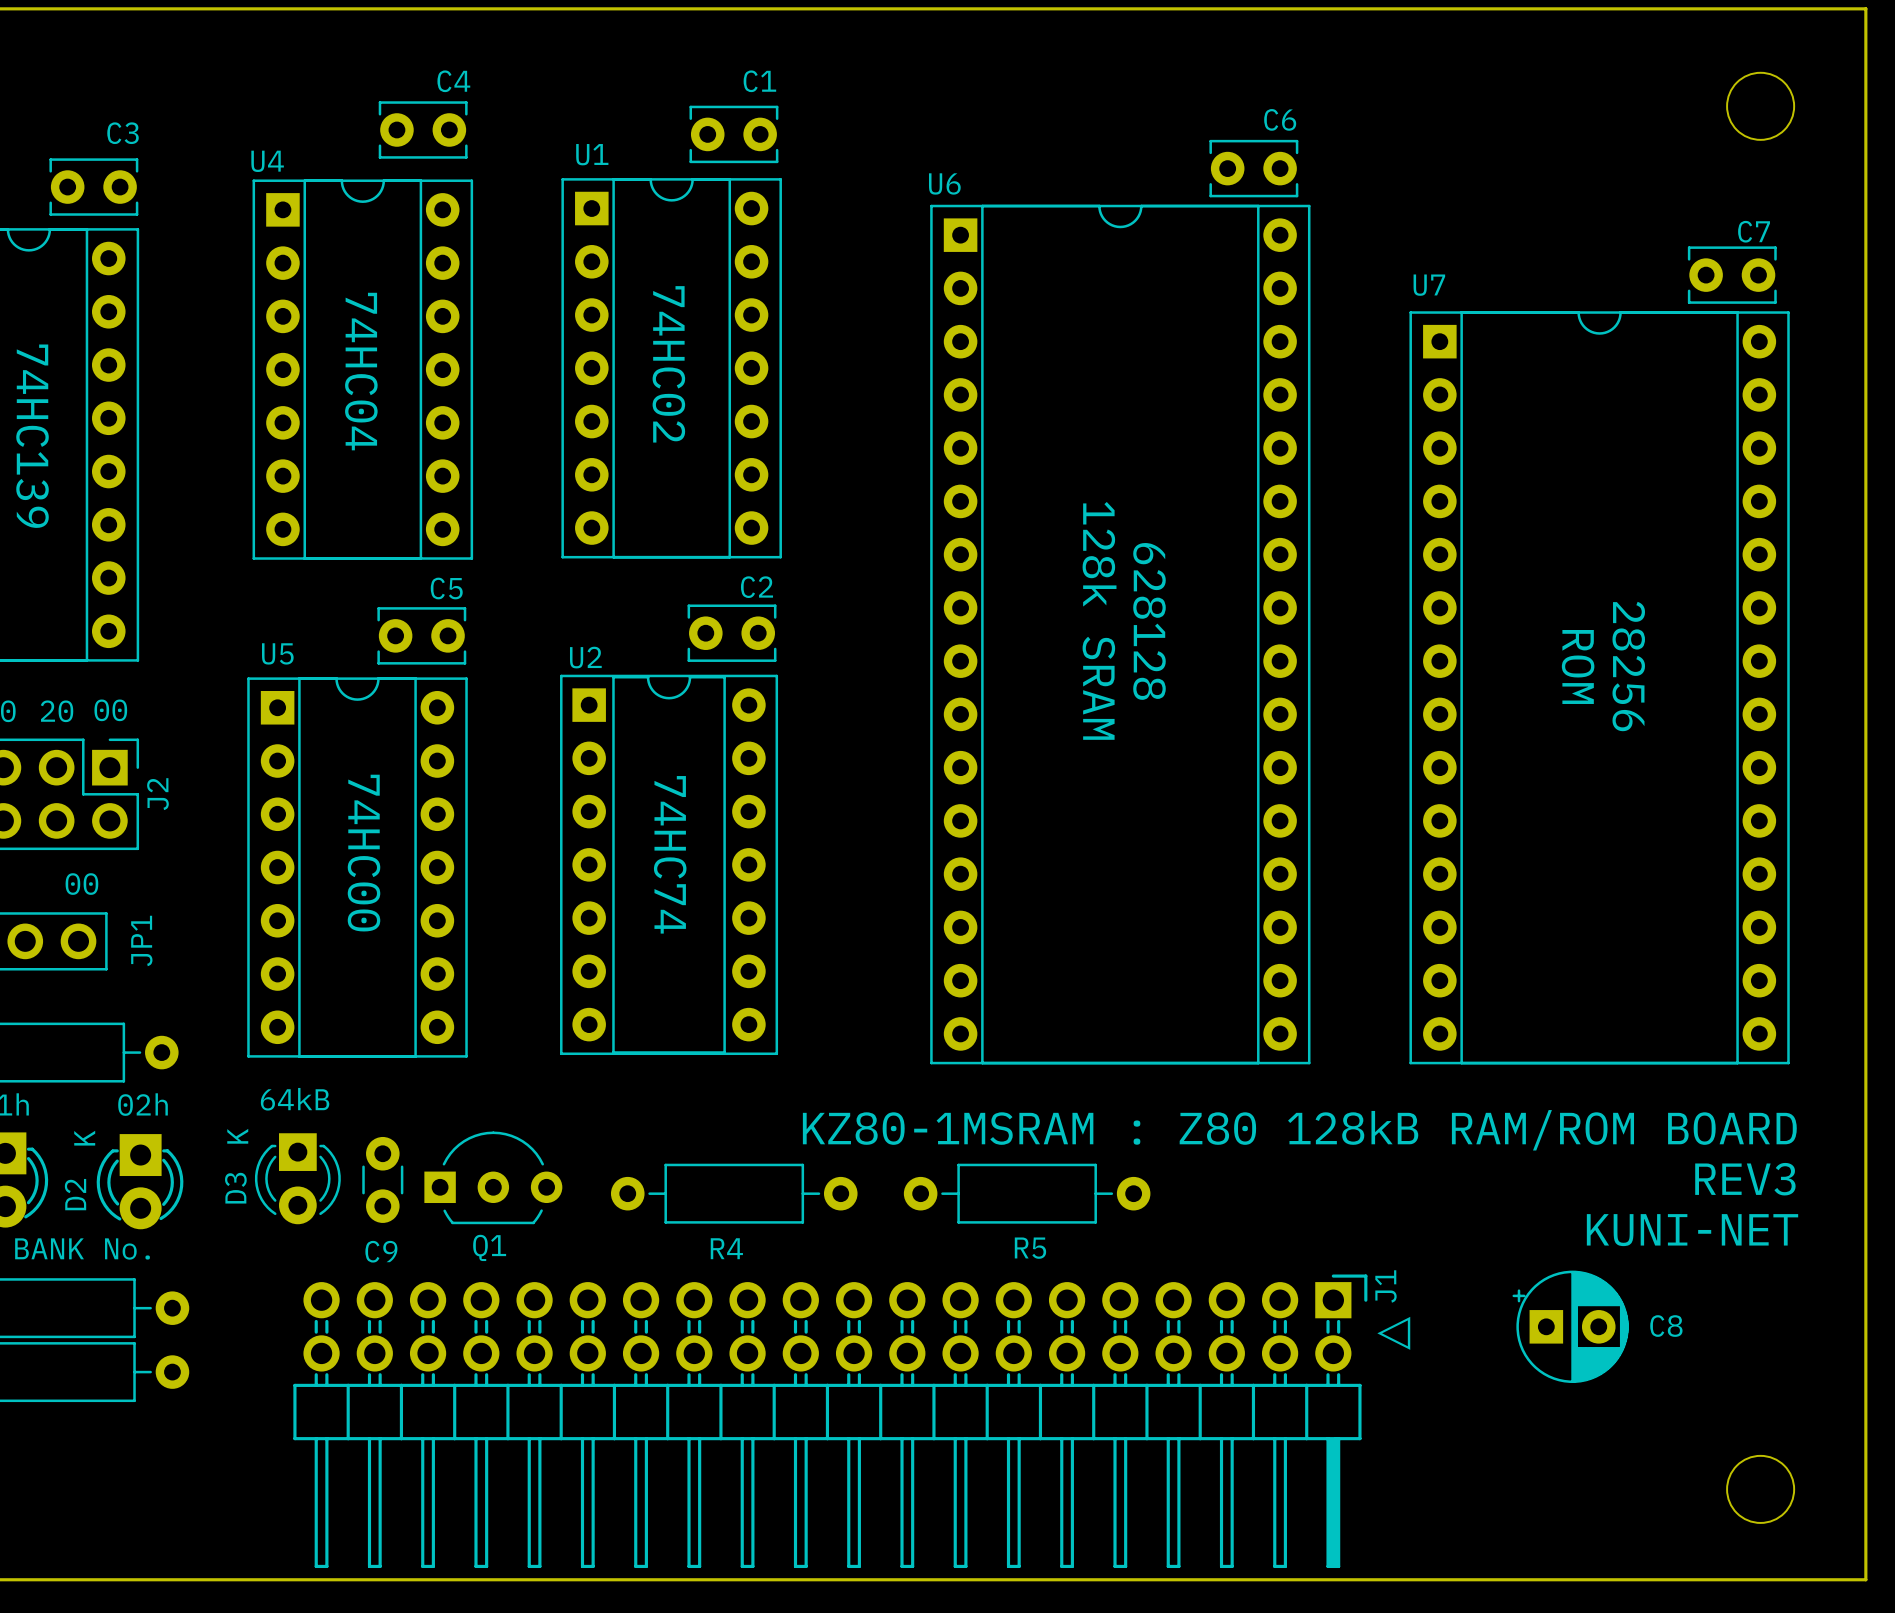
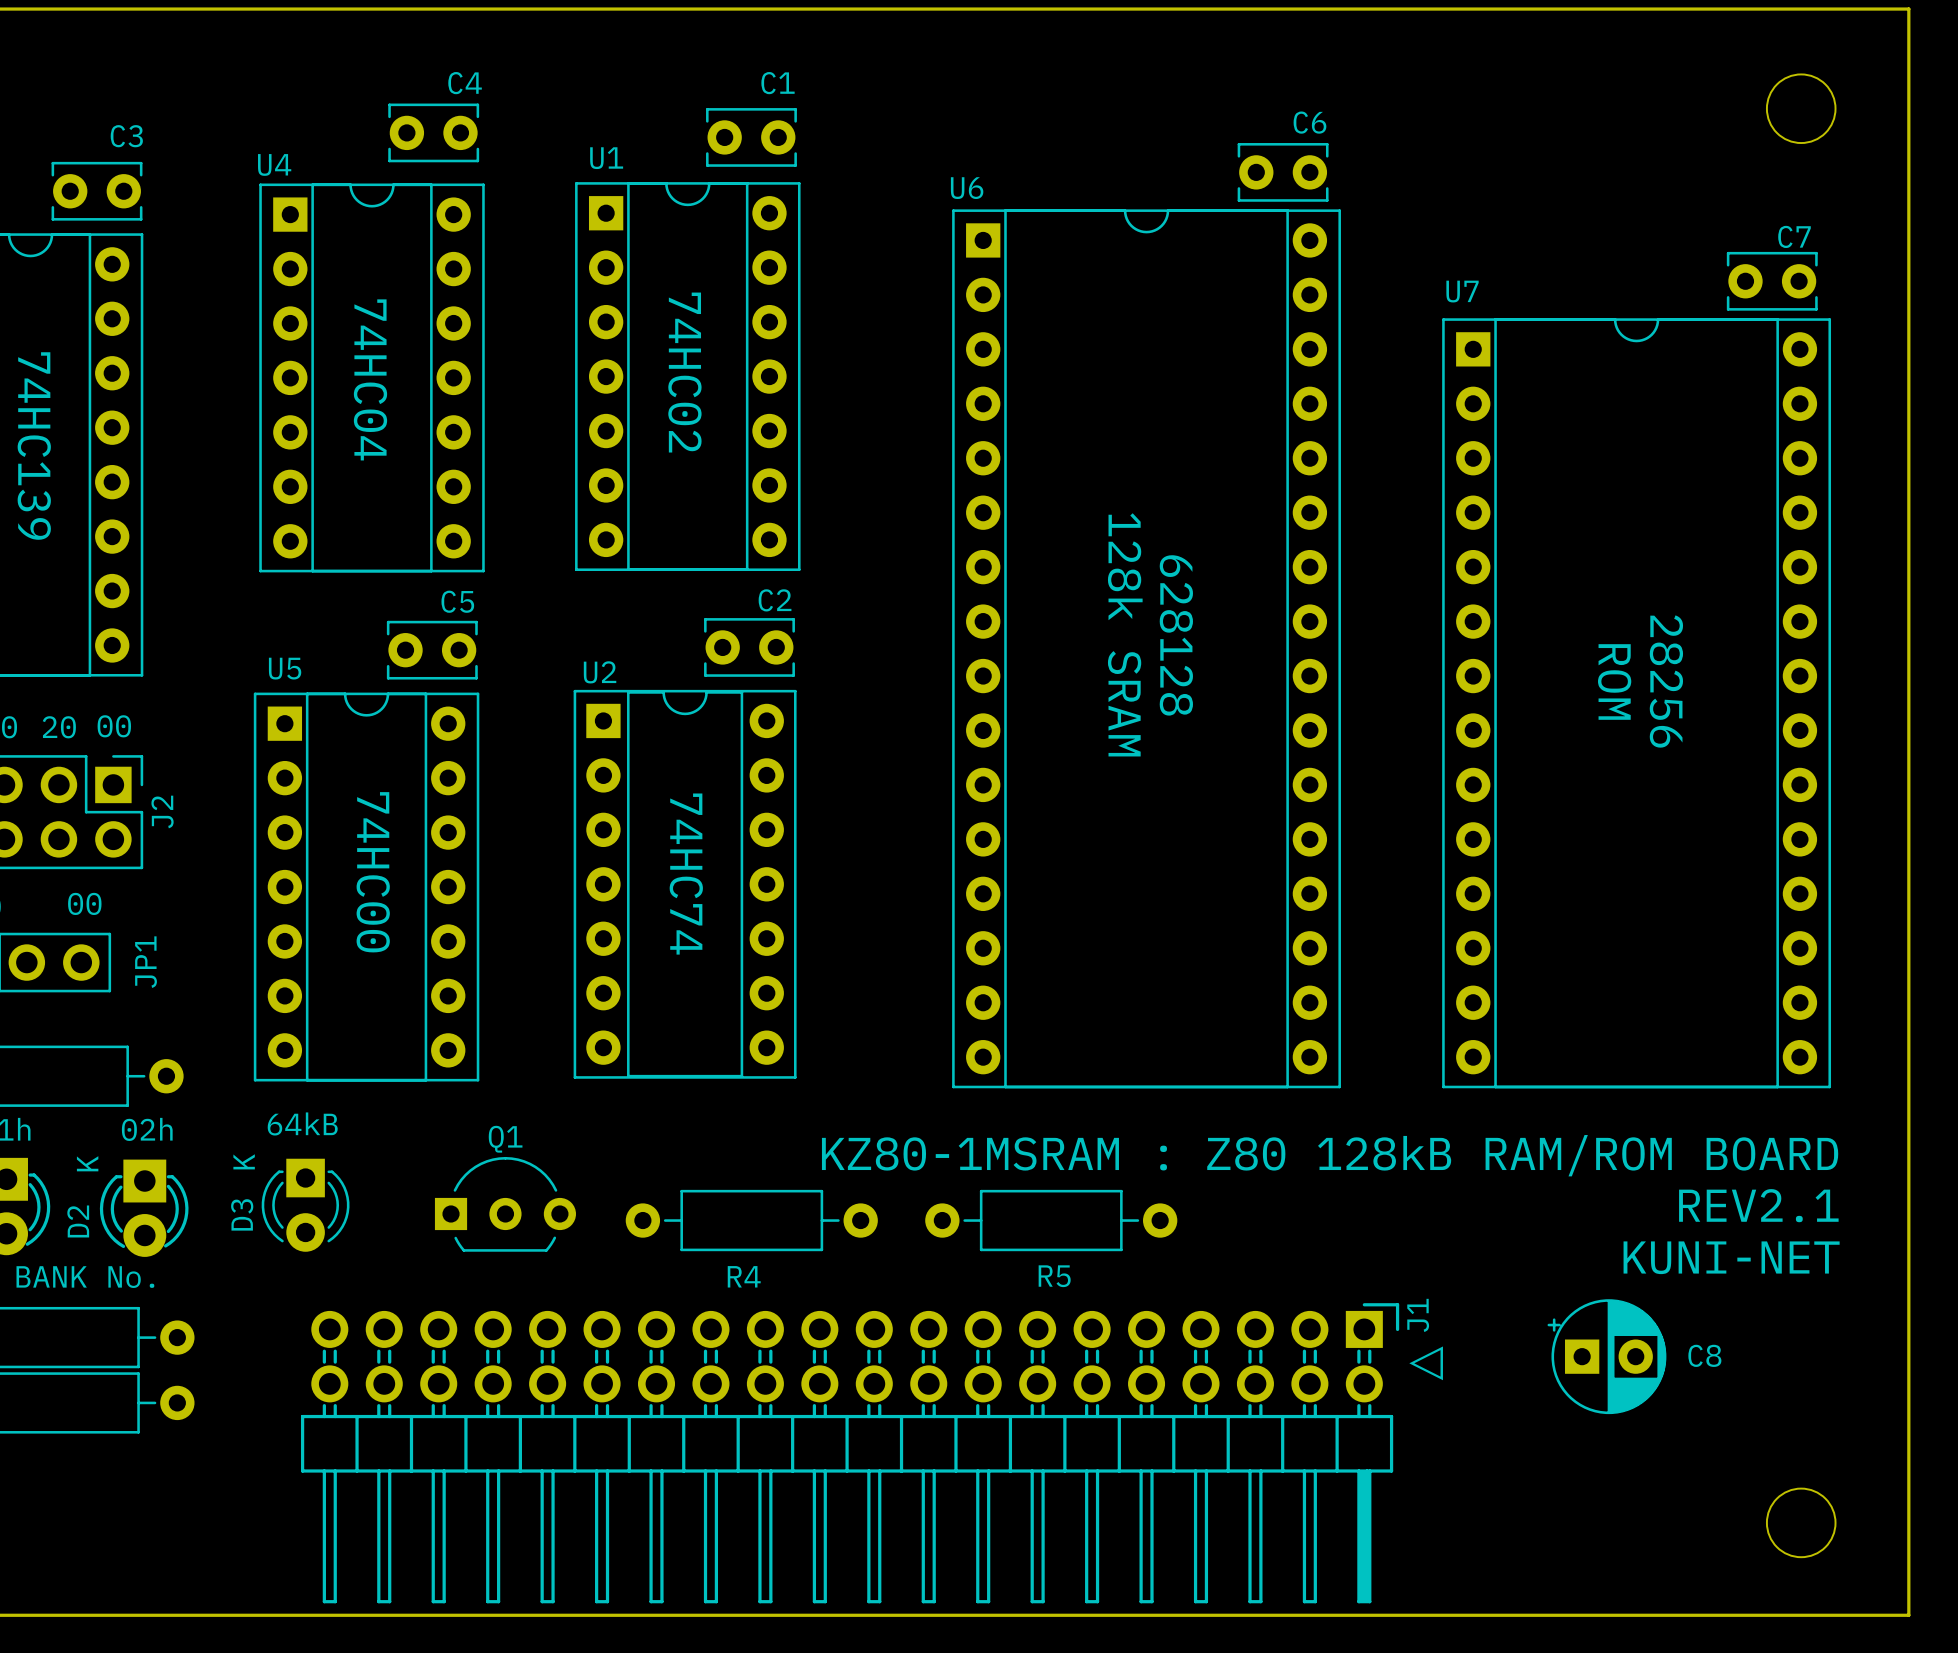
C9: (382, 1179) -> none
text: REV3 (1745, 1179) -> REV2.1 (1758, 1205)
Q1 name position: Q1 (489, 1247) -> Q1 (505, 1139)

